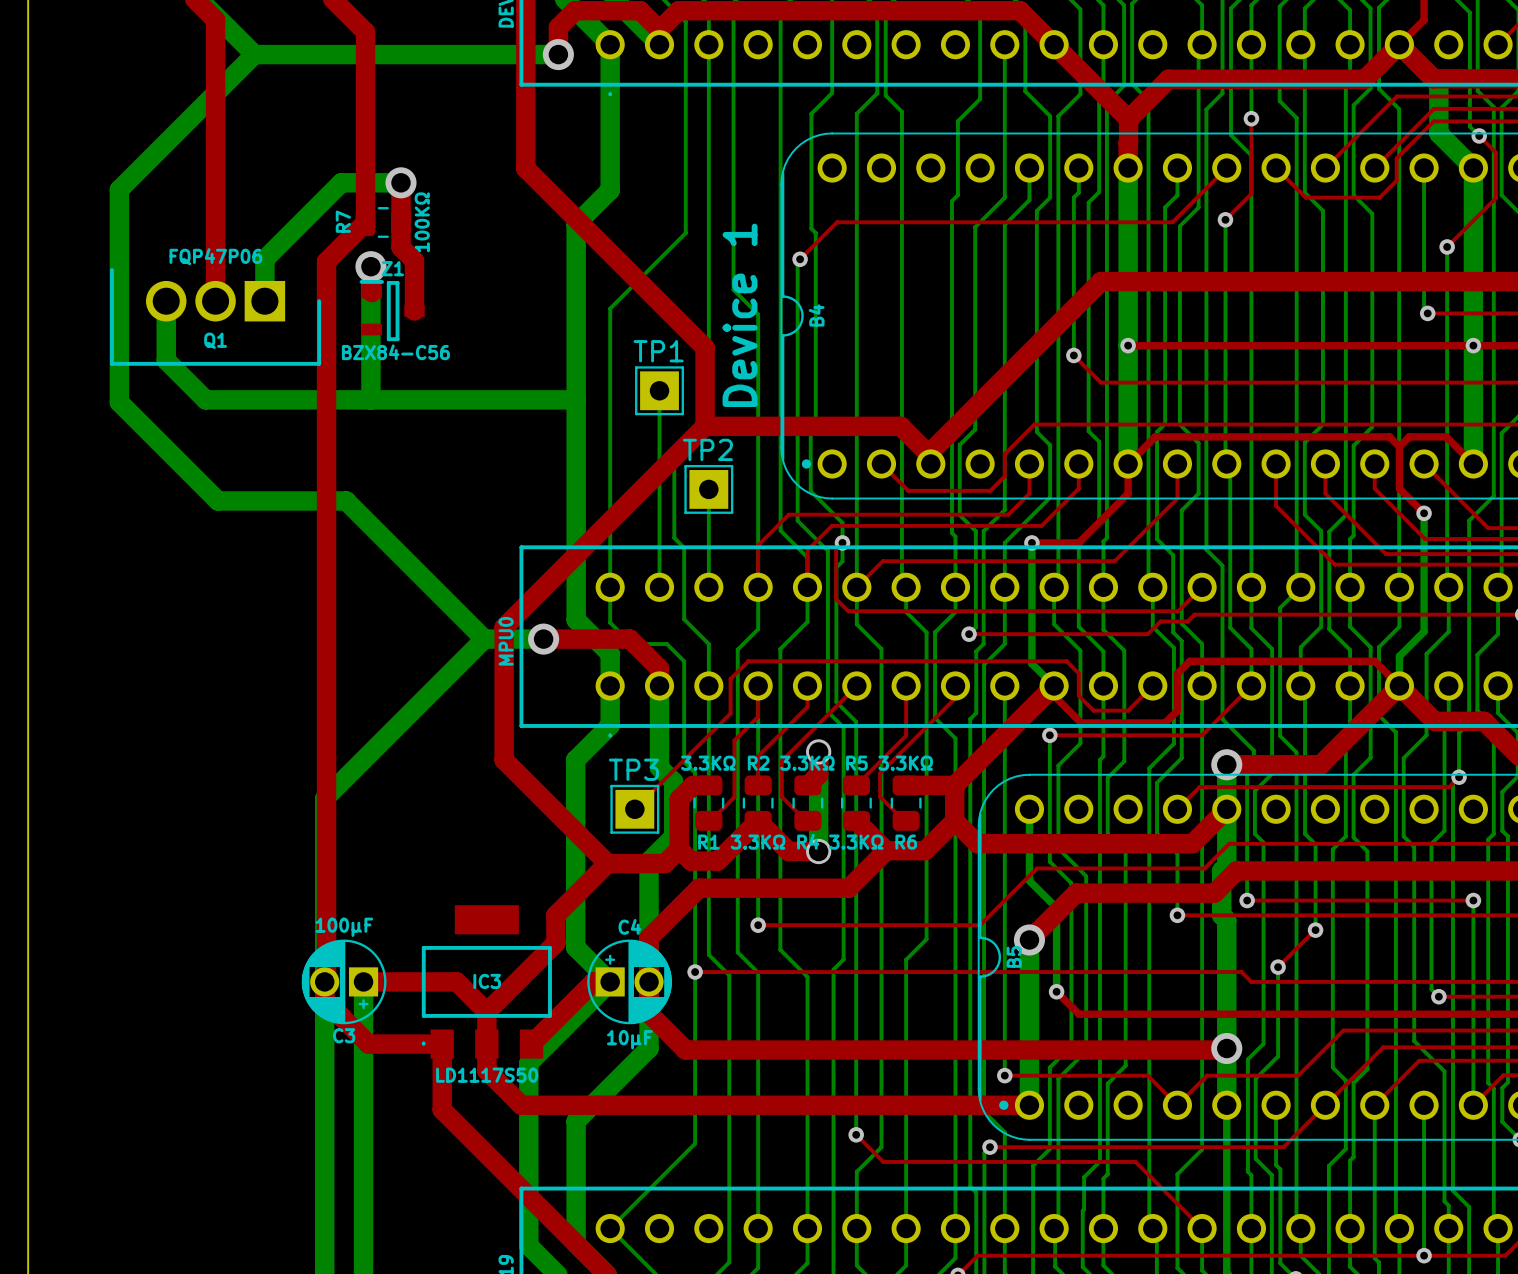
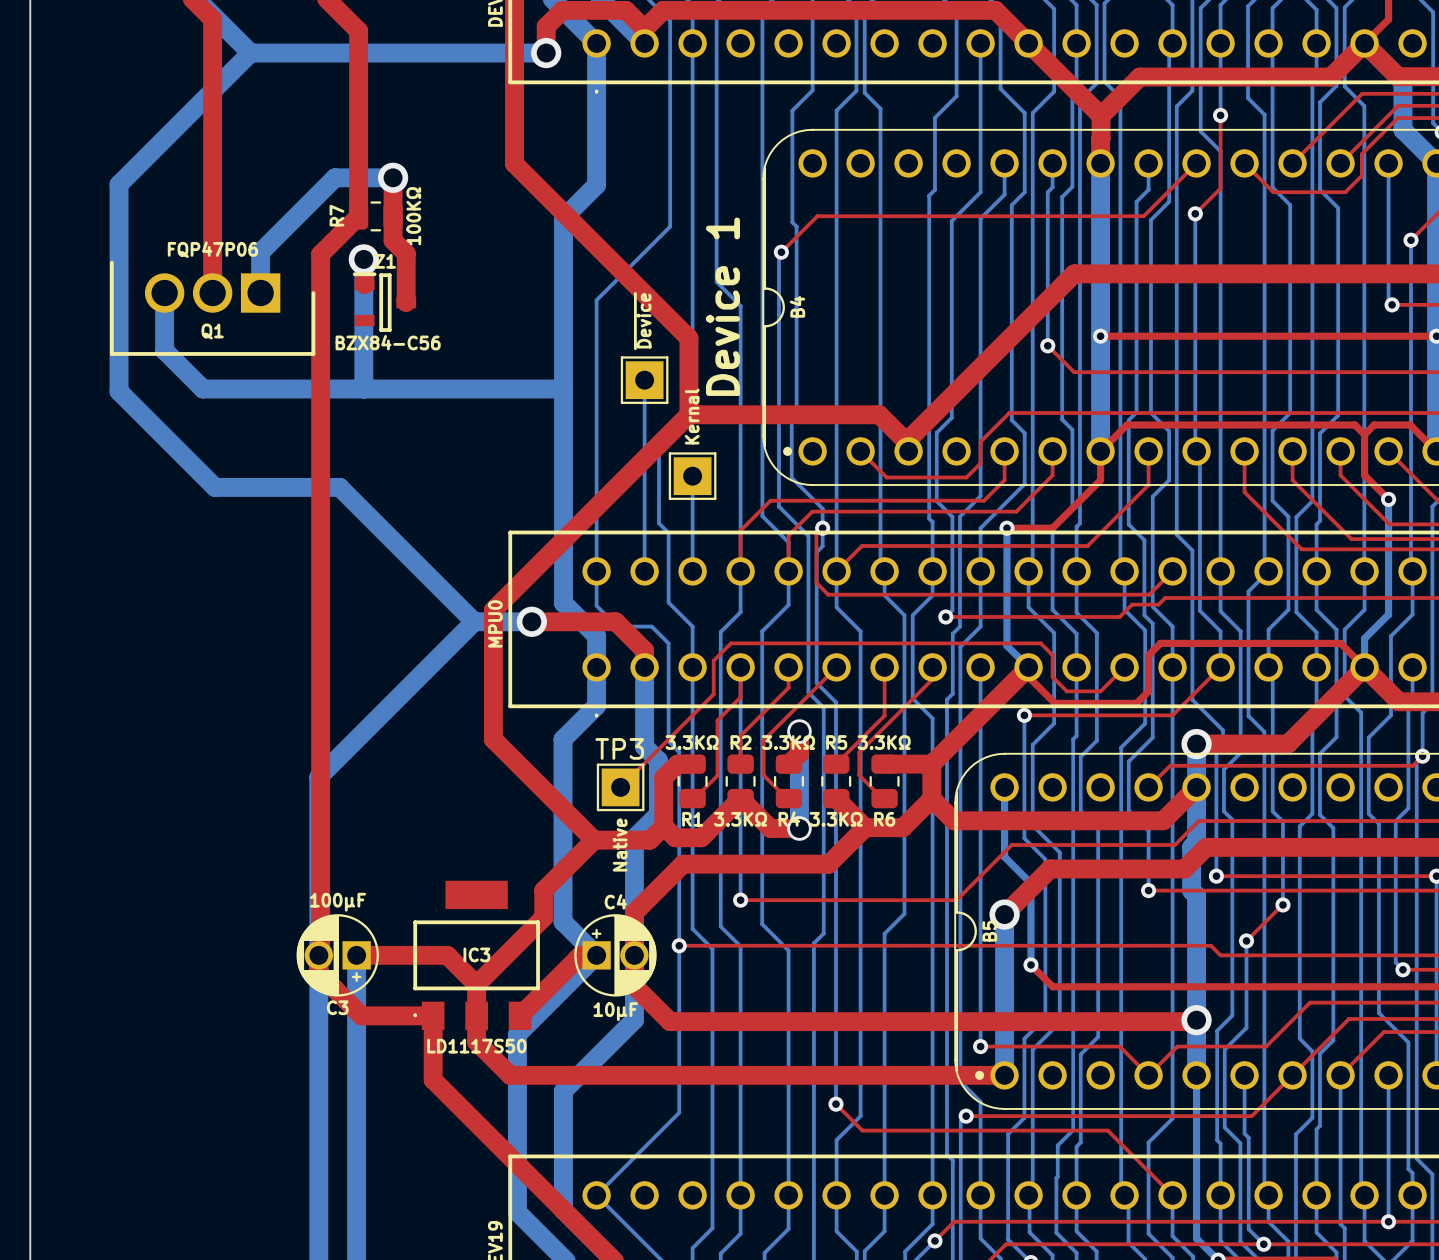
text: none -> ~{Device} (642, 321)
TP1 name: TP1 (658, 351) -> none
text: none -> Kernal (692, 416)
TP2 name: TP2 (707, 449) -> none
text: none -> Native (620, 845)

